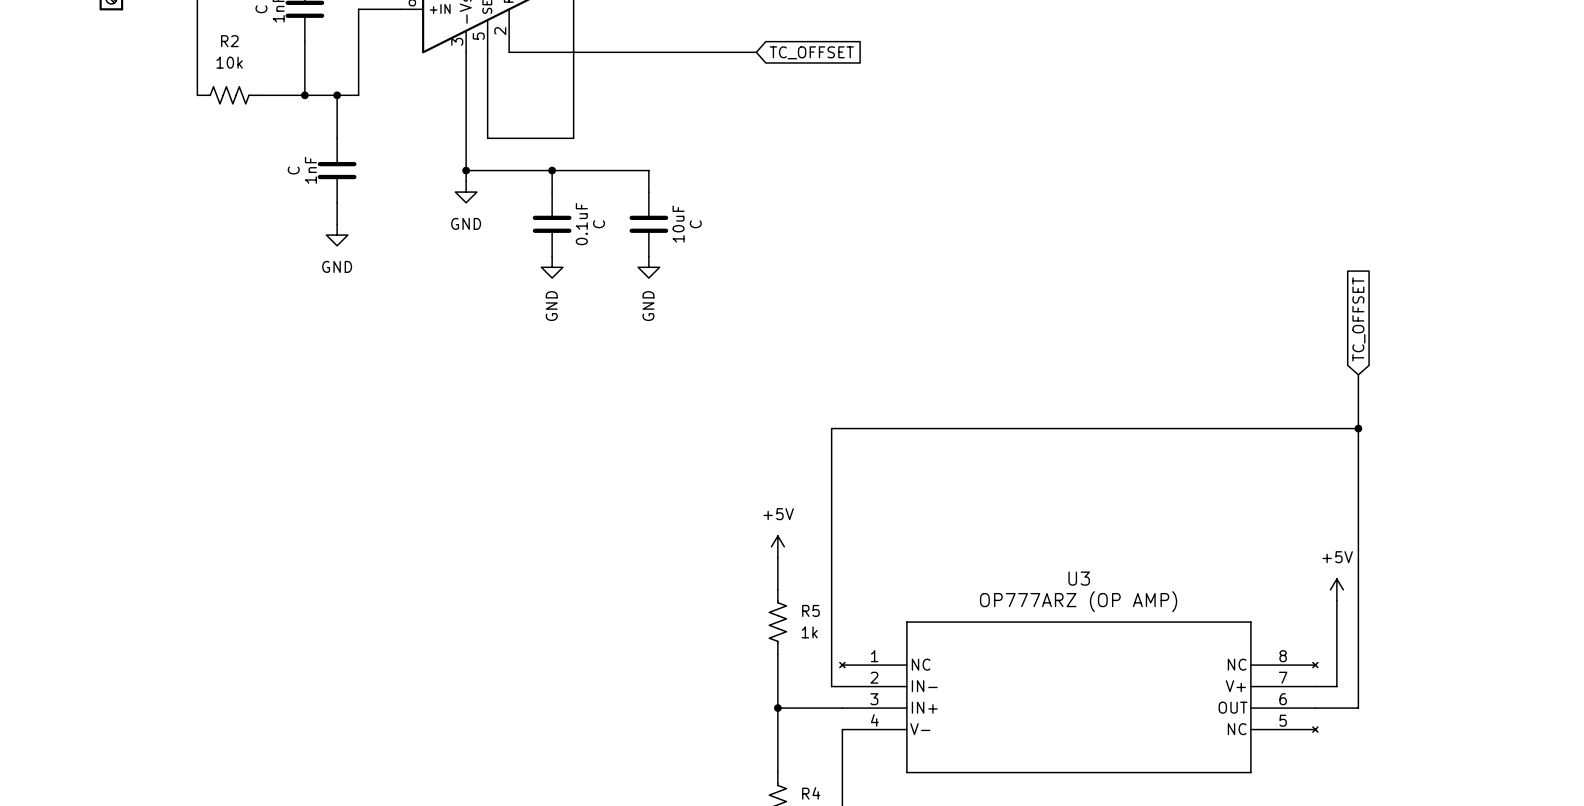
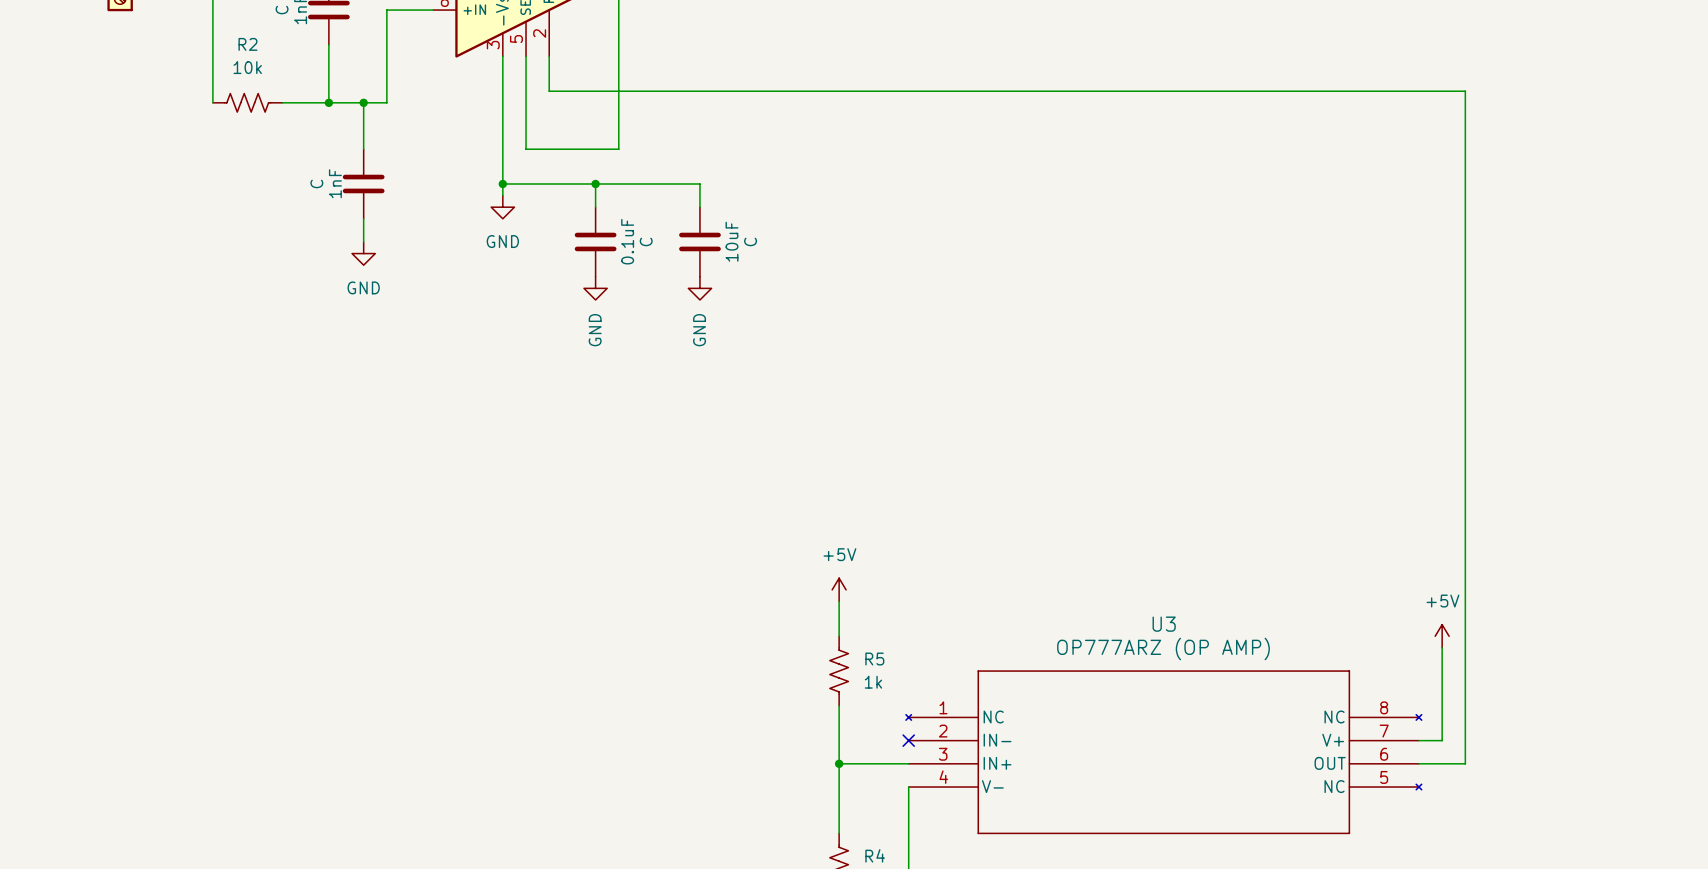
wire: (509, 52) (756, 52) -> (549, 56) (549, 91) (1465, 91) (1465, 404)
global label: TC_OFFSET (811, 52) -> none
global label: TC_OFFSET (1358, 319) -> none
wire: (1358, 428) (831, 428) (831, 686) (842, 686) -> none
junction: (1358, 428) -> none
no-connect mark: none -> (908, 740)

